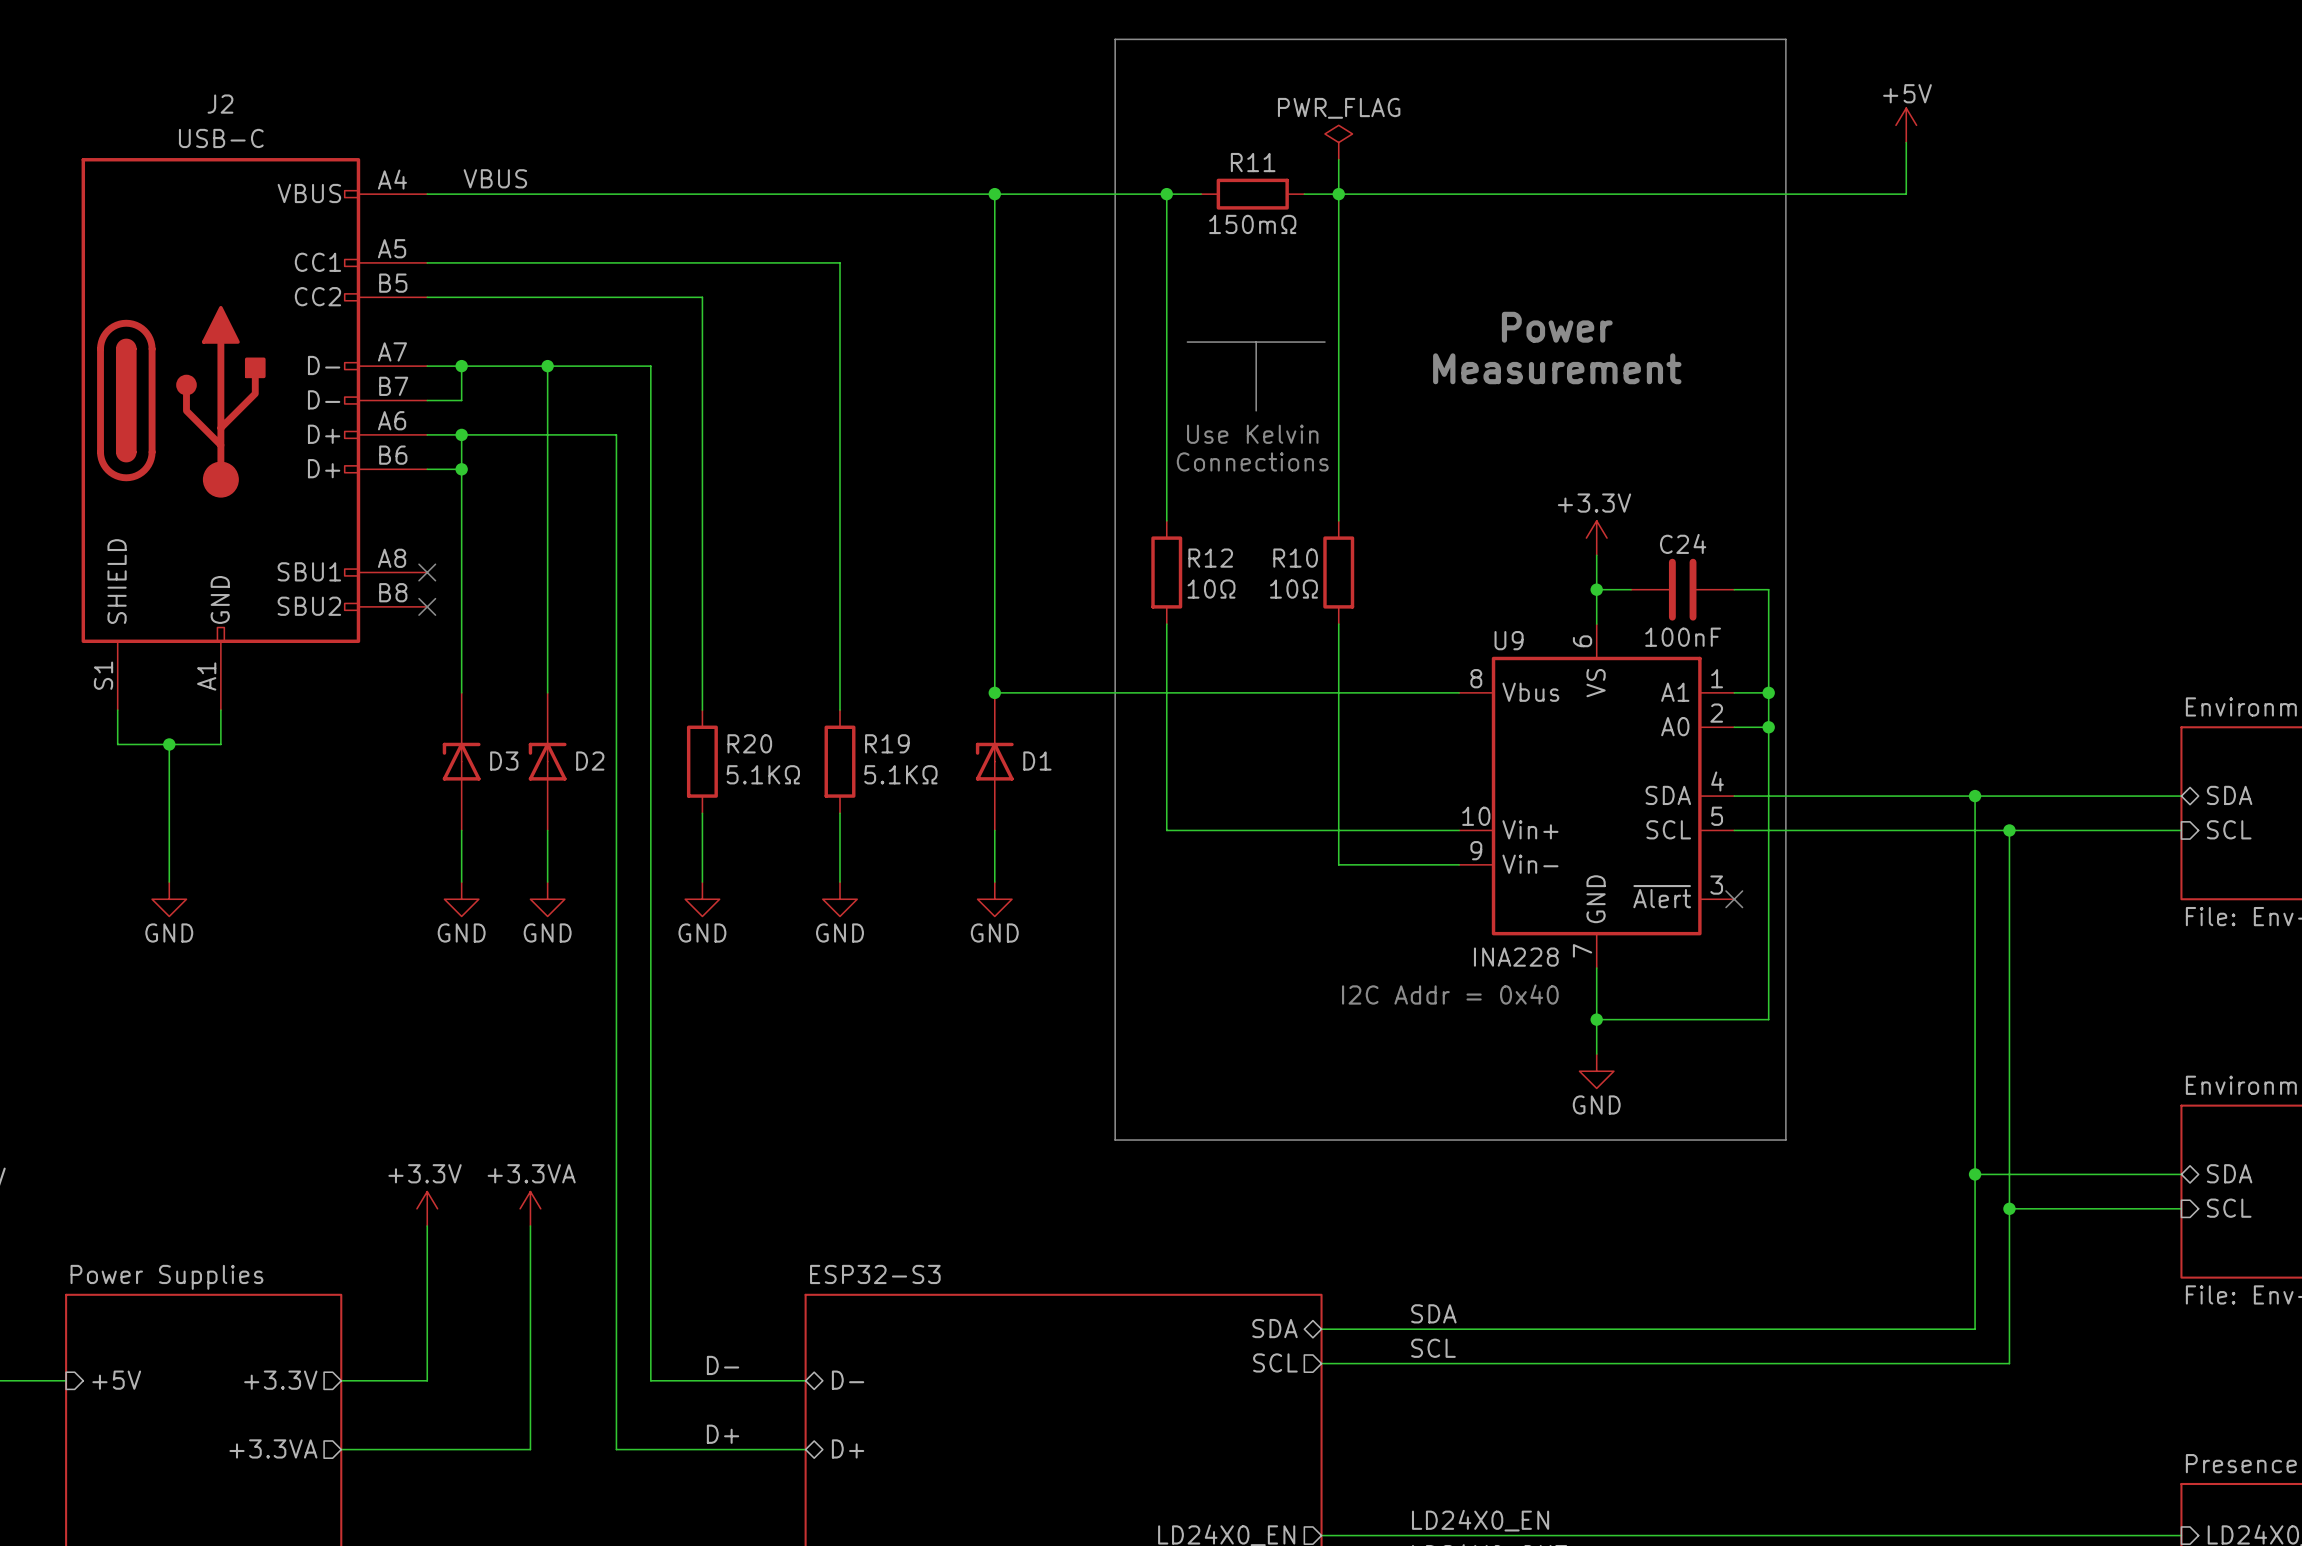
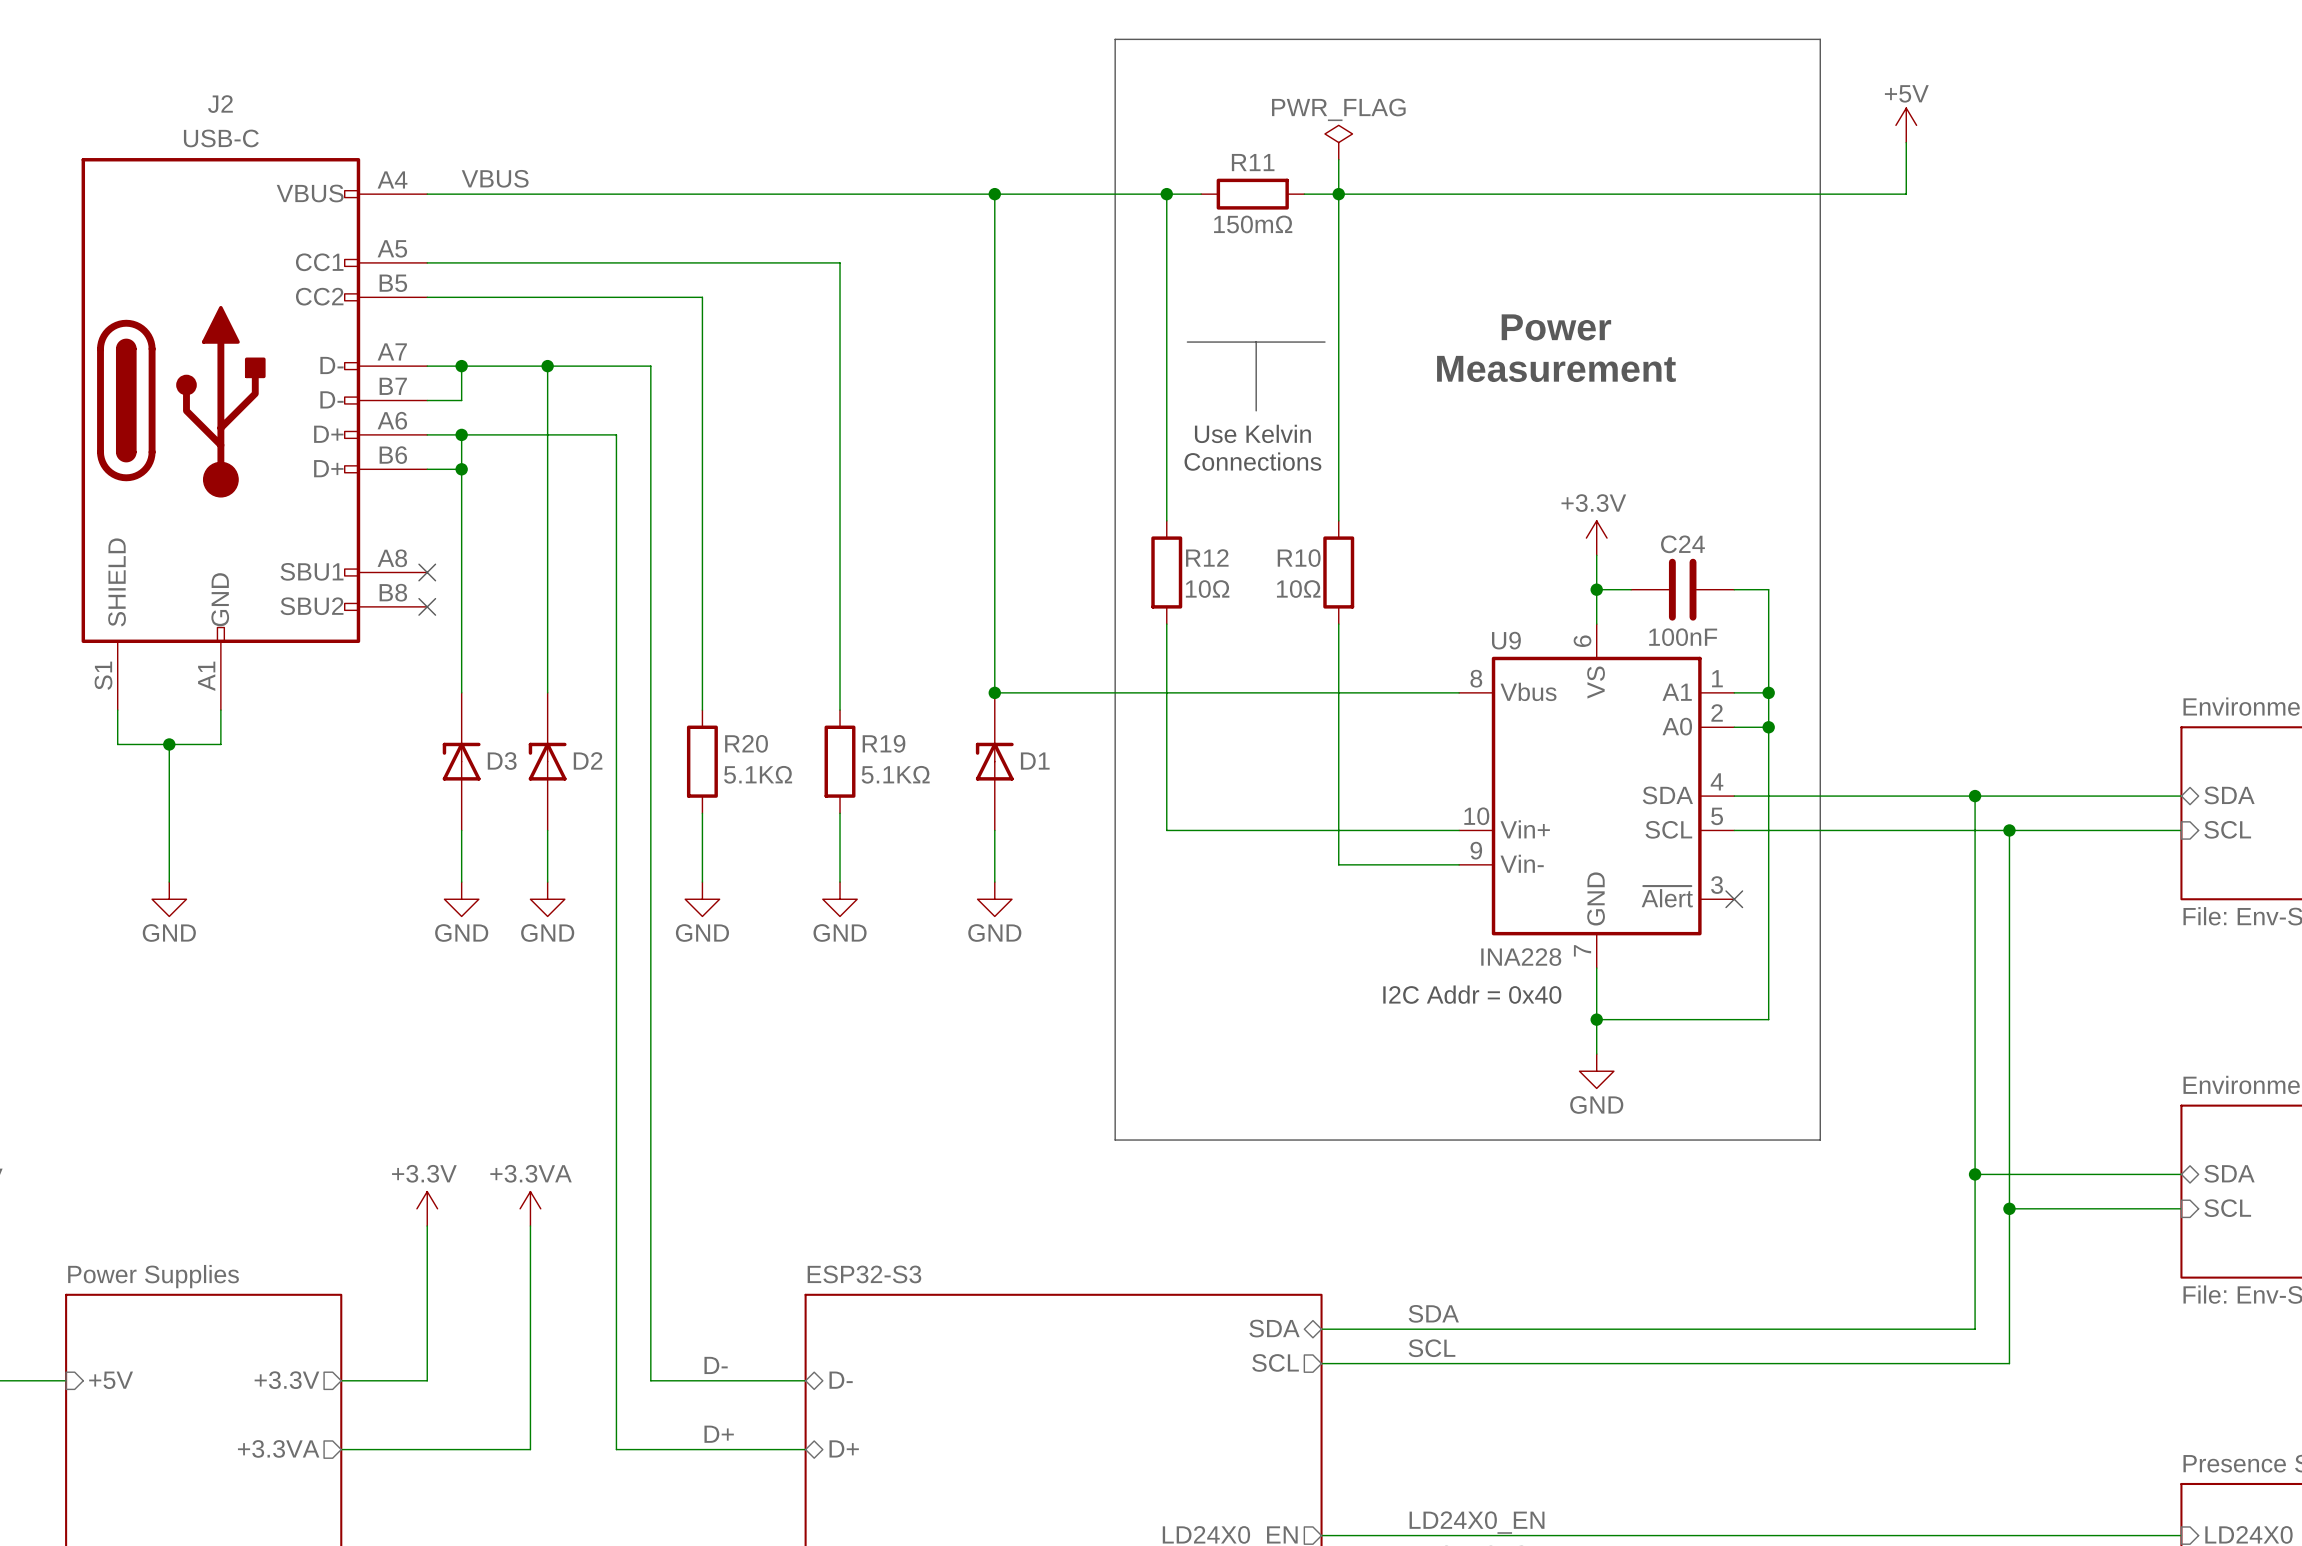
line: (1785, 39) (1785, 1140) -> (1785, 39) (1820, 39) (1820, 1140) (1785, 1140)

